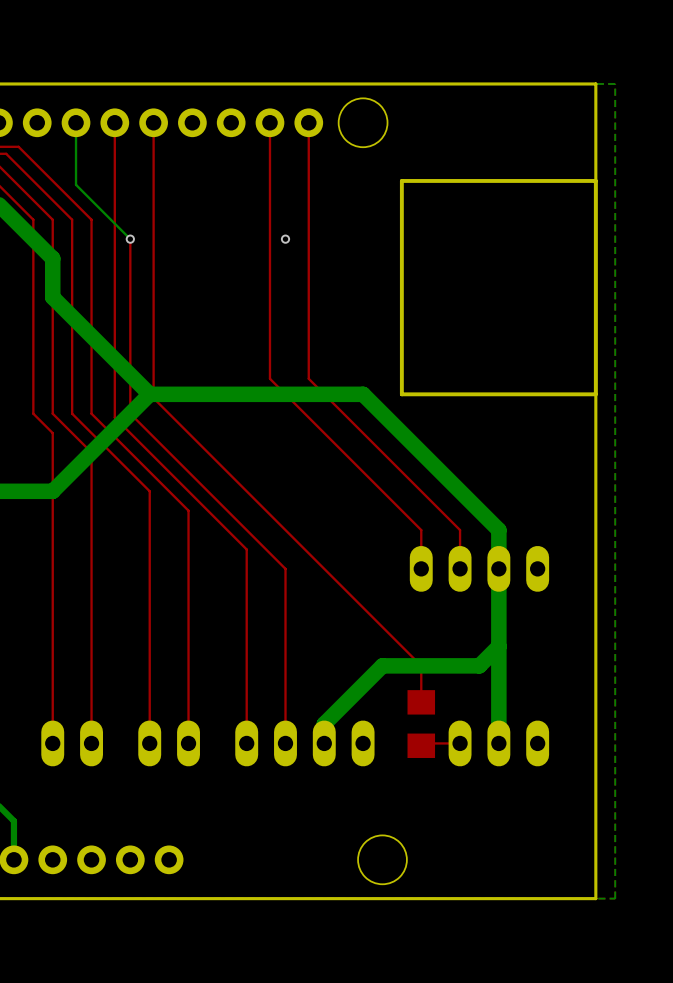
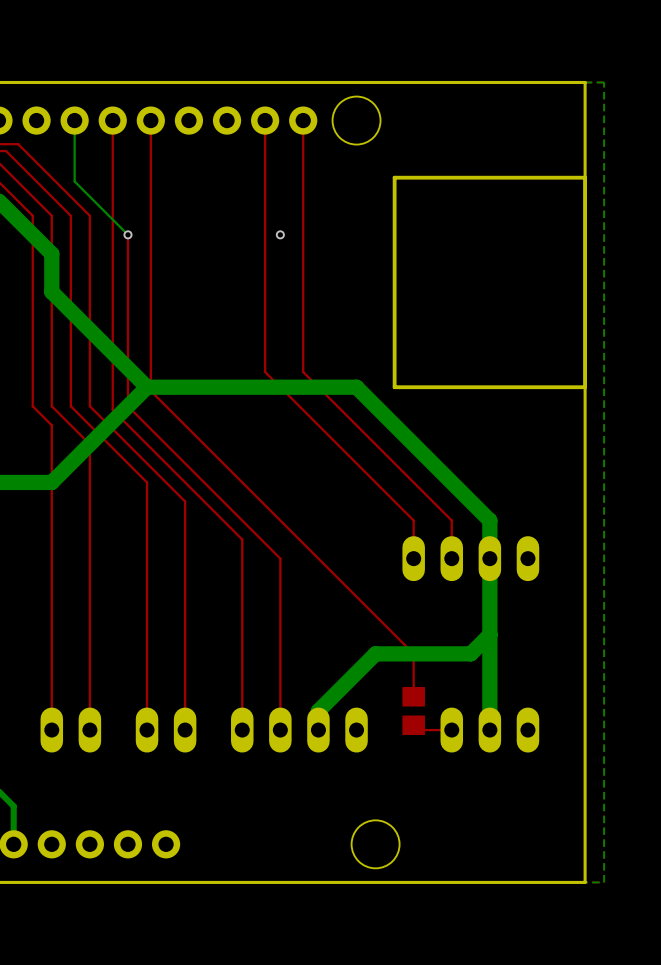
part footprint: [407, 690, 436, 758] -> [402, 687, 425, 736]

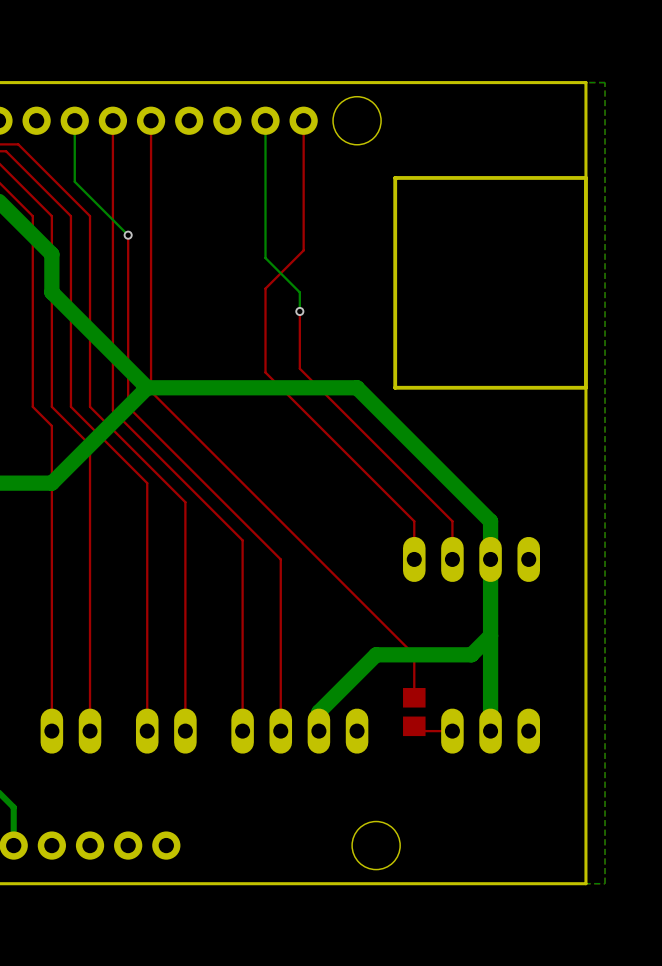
top track: (265, 120) (265, 288) -> (303, 250) (265, 288)
bottom track: none -> (265, 120) (265, 258) (299, 292) (299, 311)
via position: (280, 234) -> (299, 311)
top track: (303, 250) (303, 371) -> (299, 311) (299, 368) (303, 372)

